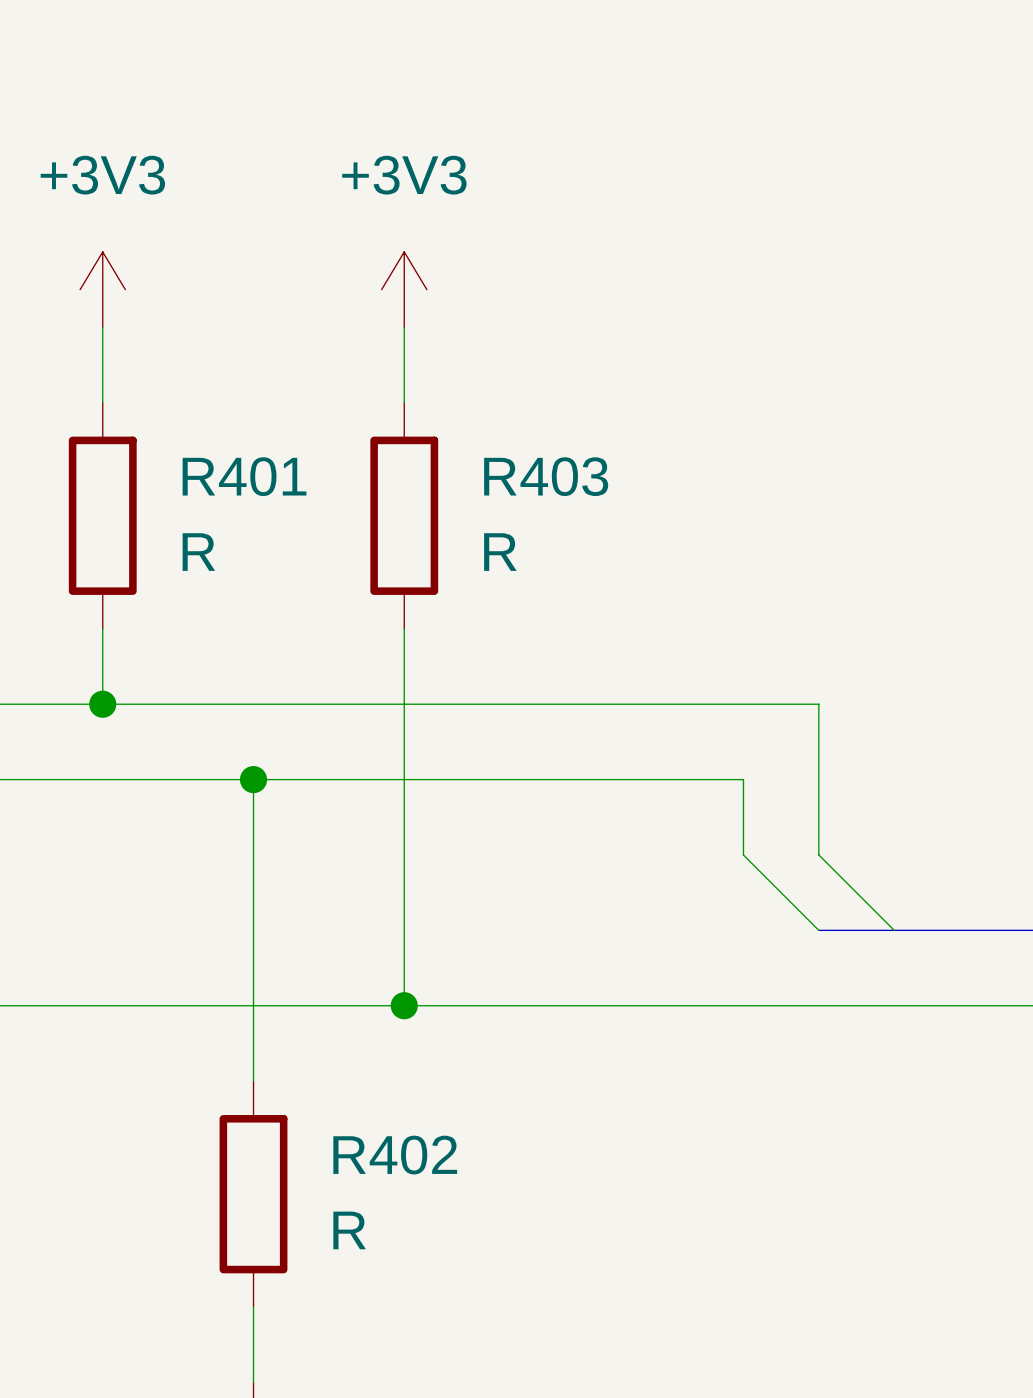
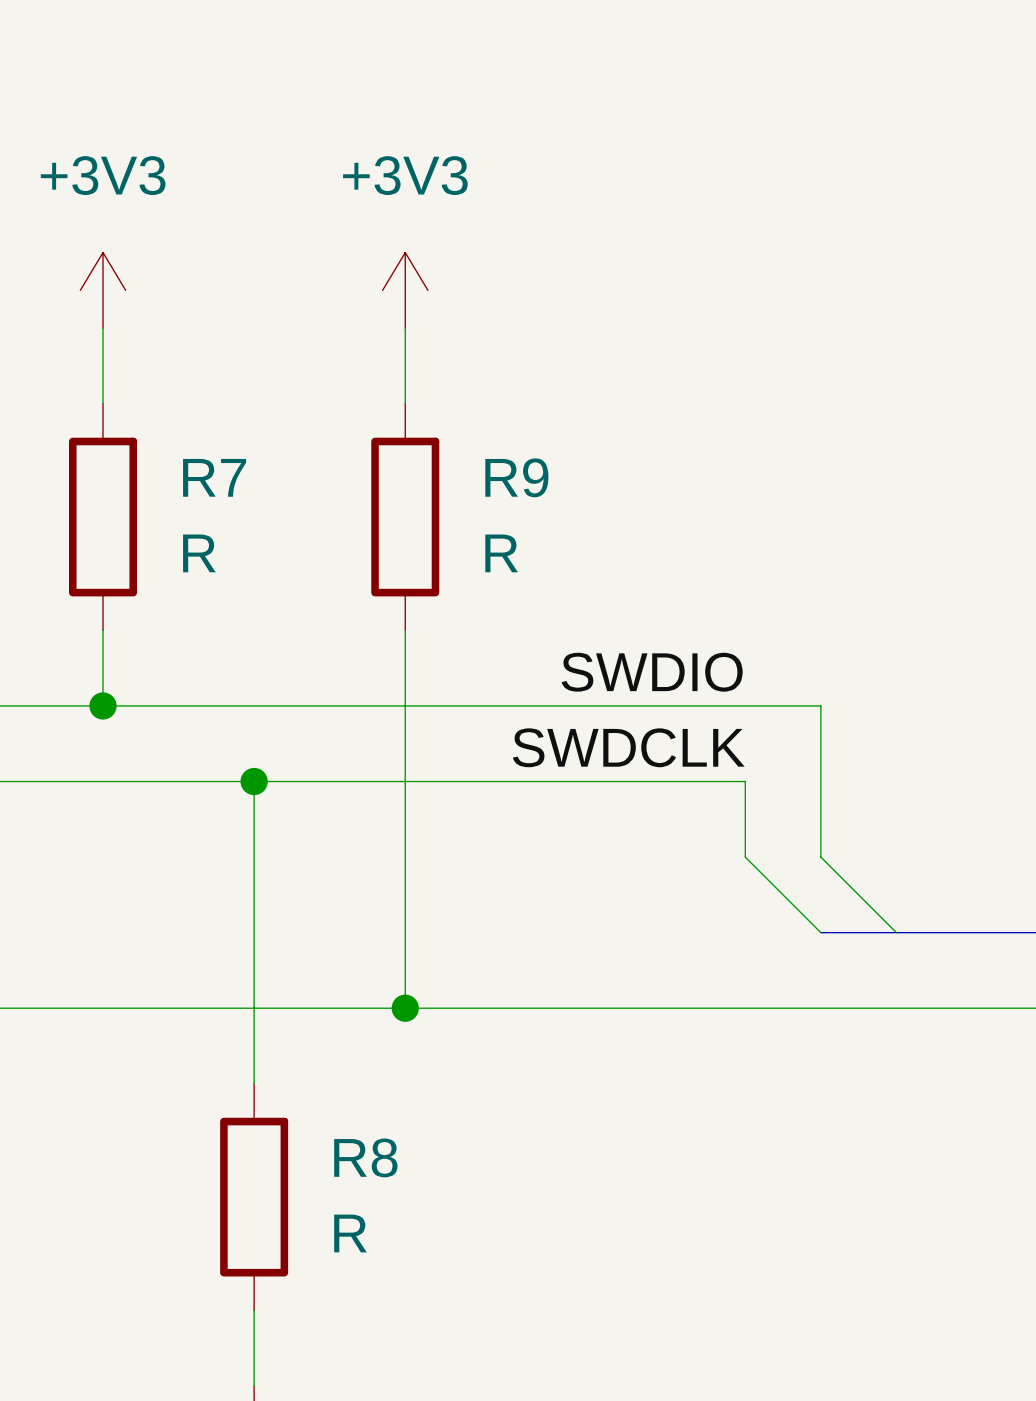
R401 name: R401 (244, 476) -> R7 (214, 477)
R403 name: R403 (546, 476) -> R9 (516, 477)
label: none -> SWDIO (652, 672)
label: none -> SWDCLK (628, 747)
R402 name: R402 (395, 1155) -> R8 (365, 1157)

